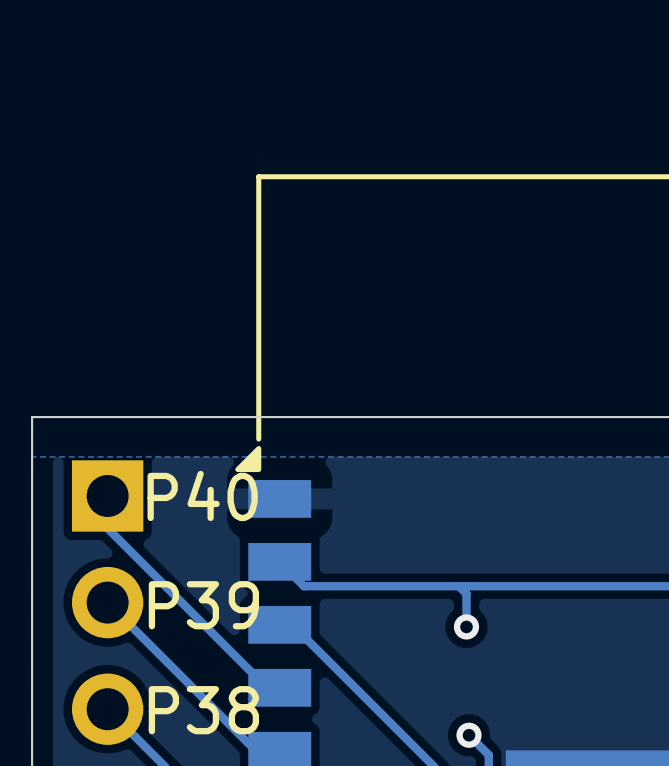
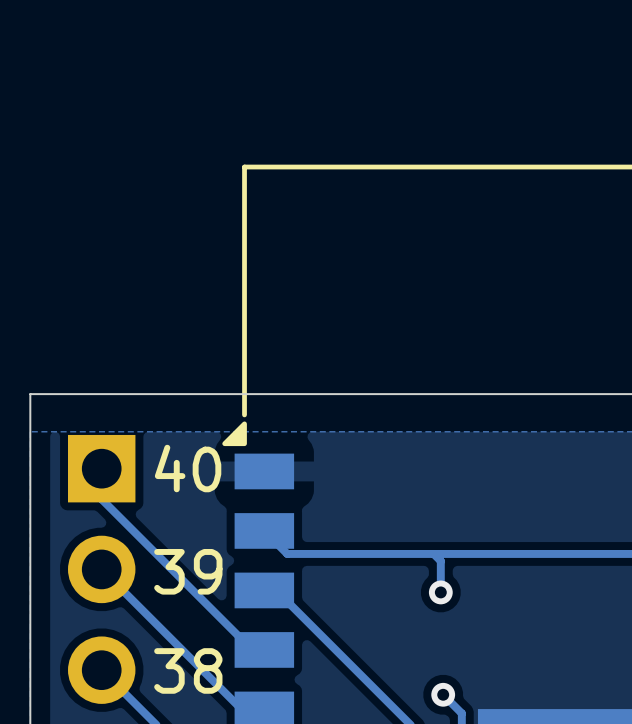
text: P40 (202, 495) -> 40 (188, 468)
text: P39 (203, 605) -> 39 (188, 571)
text: P38 (203, 710) -> 38 (188, 670)

